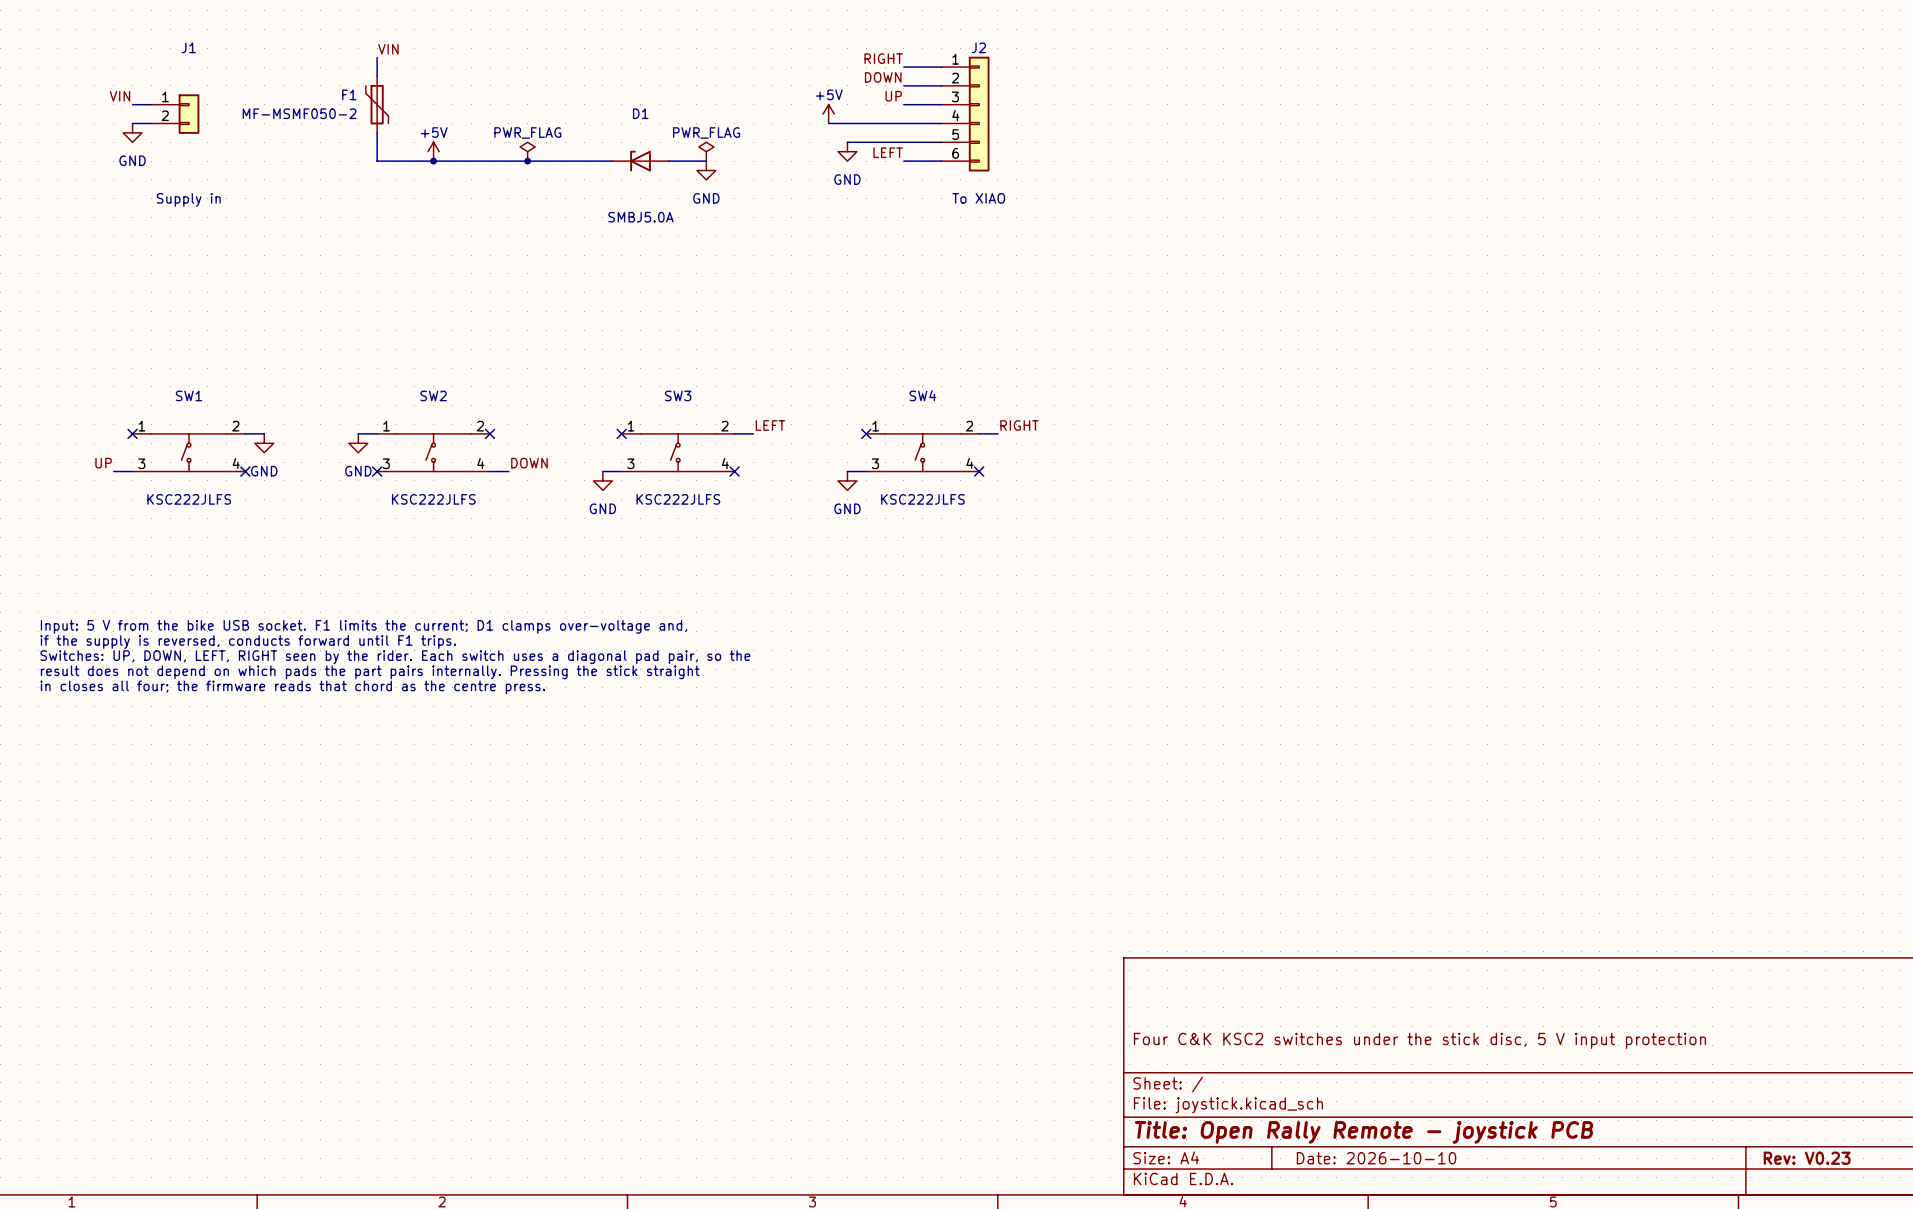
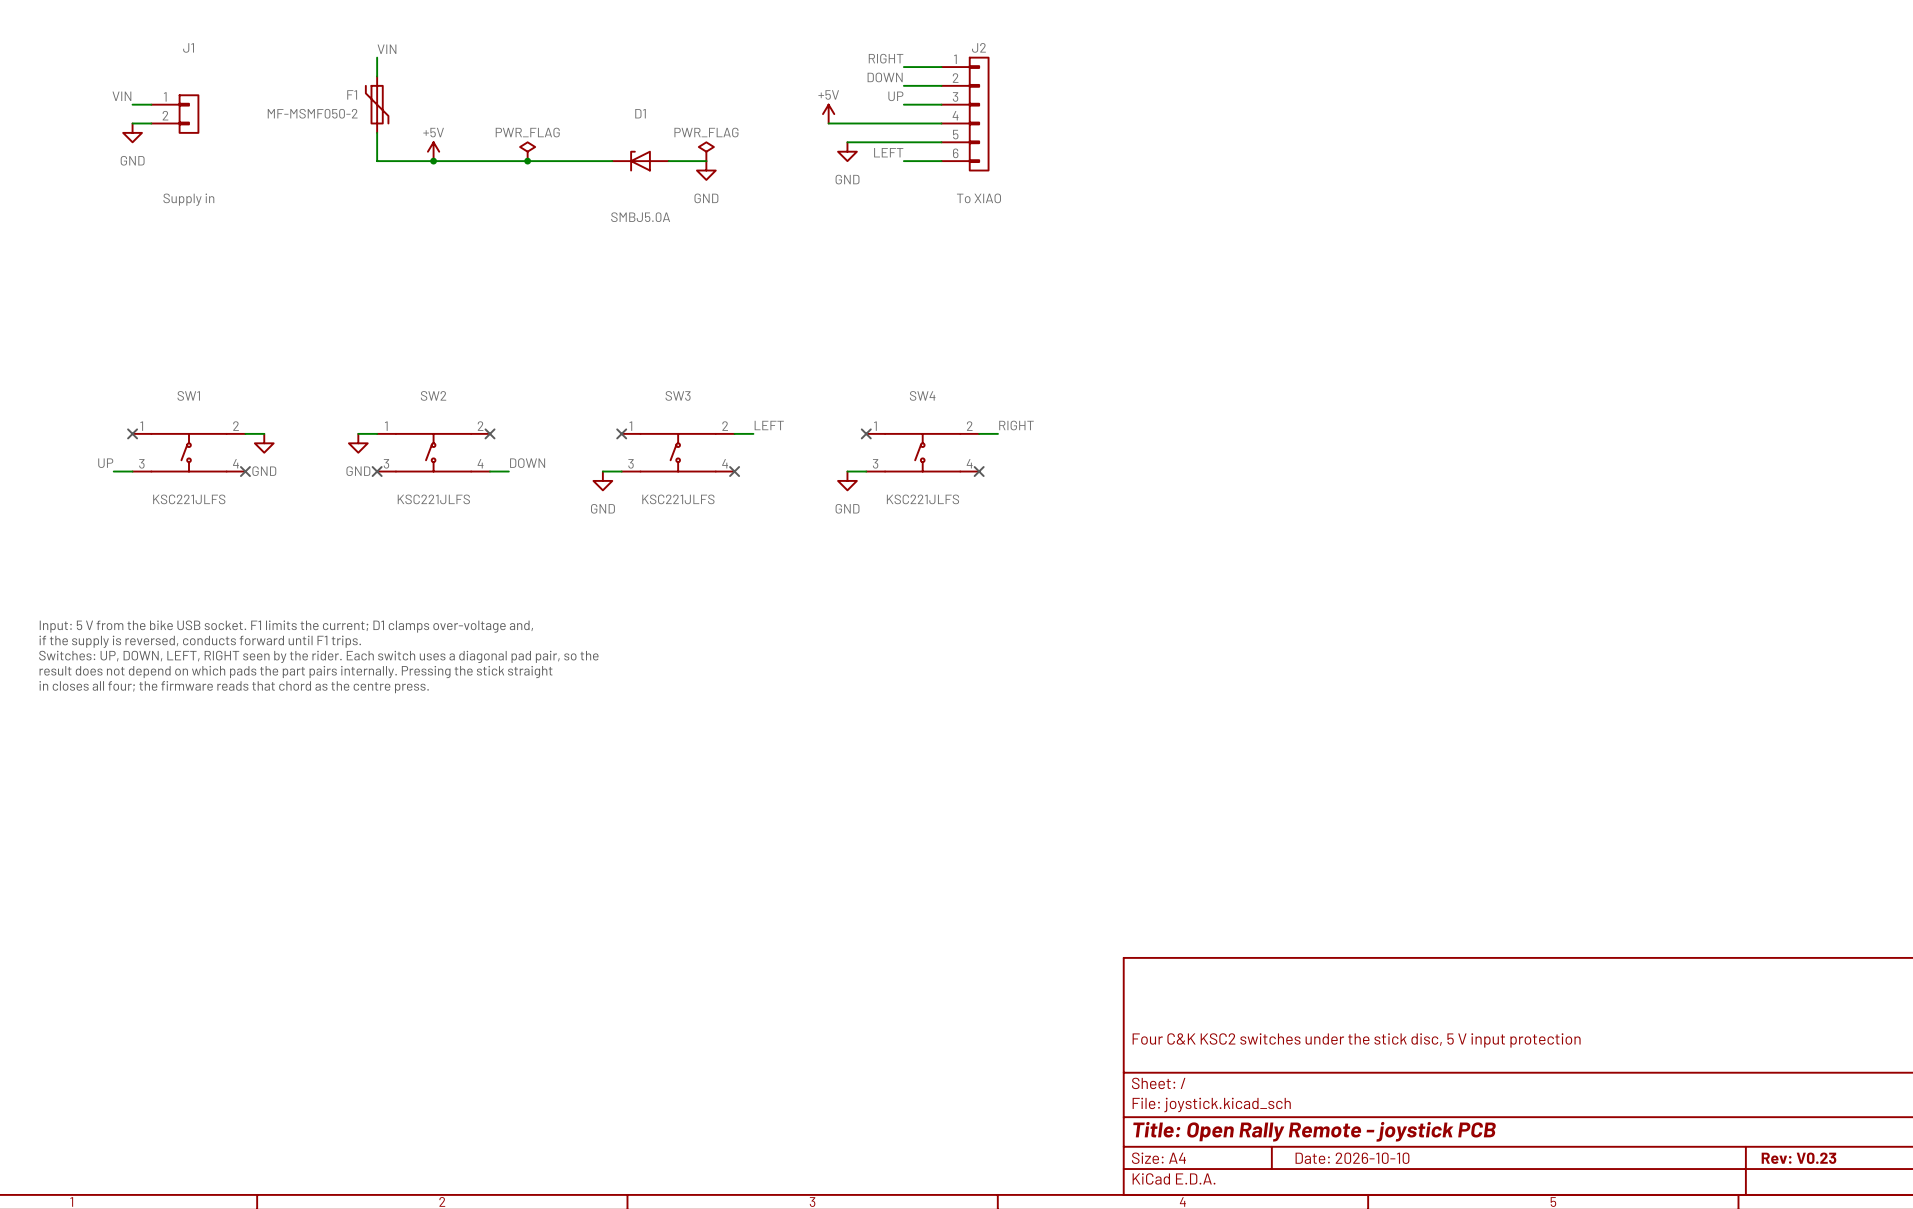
SW1 value: KSC222JLFS (189, 499) -> KSC221JLFS (189, 499)
SW2 value: KSC222JLFS (433, 499) -> KSC221JLFS (433, 499)
SW3 value: KSC222JLFS (678, 499) -> KSC221JLFS (678, 499)
SW4 value: KSC222JLFS (922, 499) -> KSC221JLFS (922, 499)

